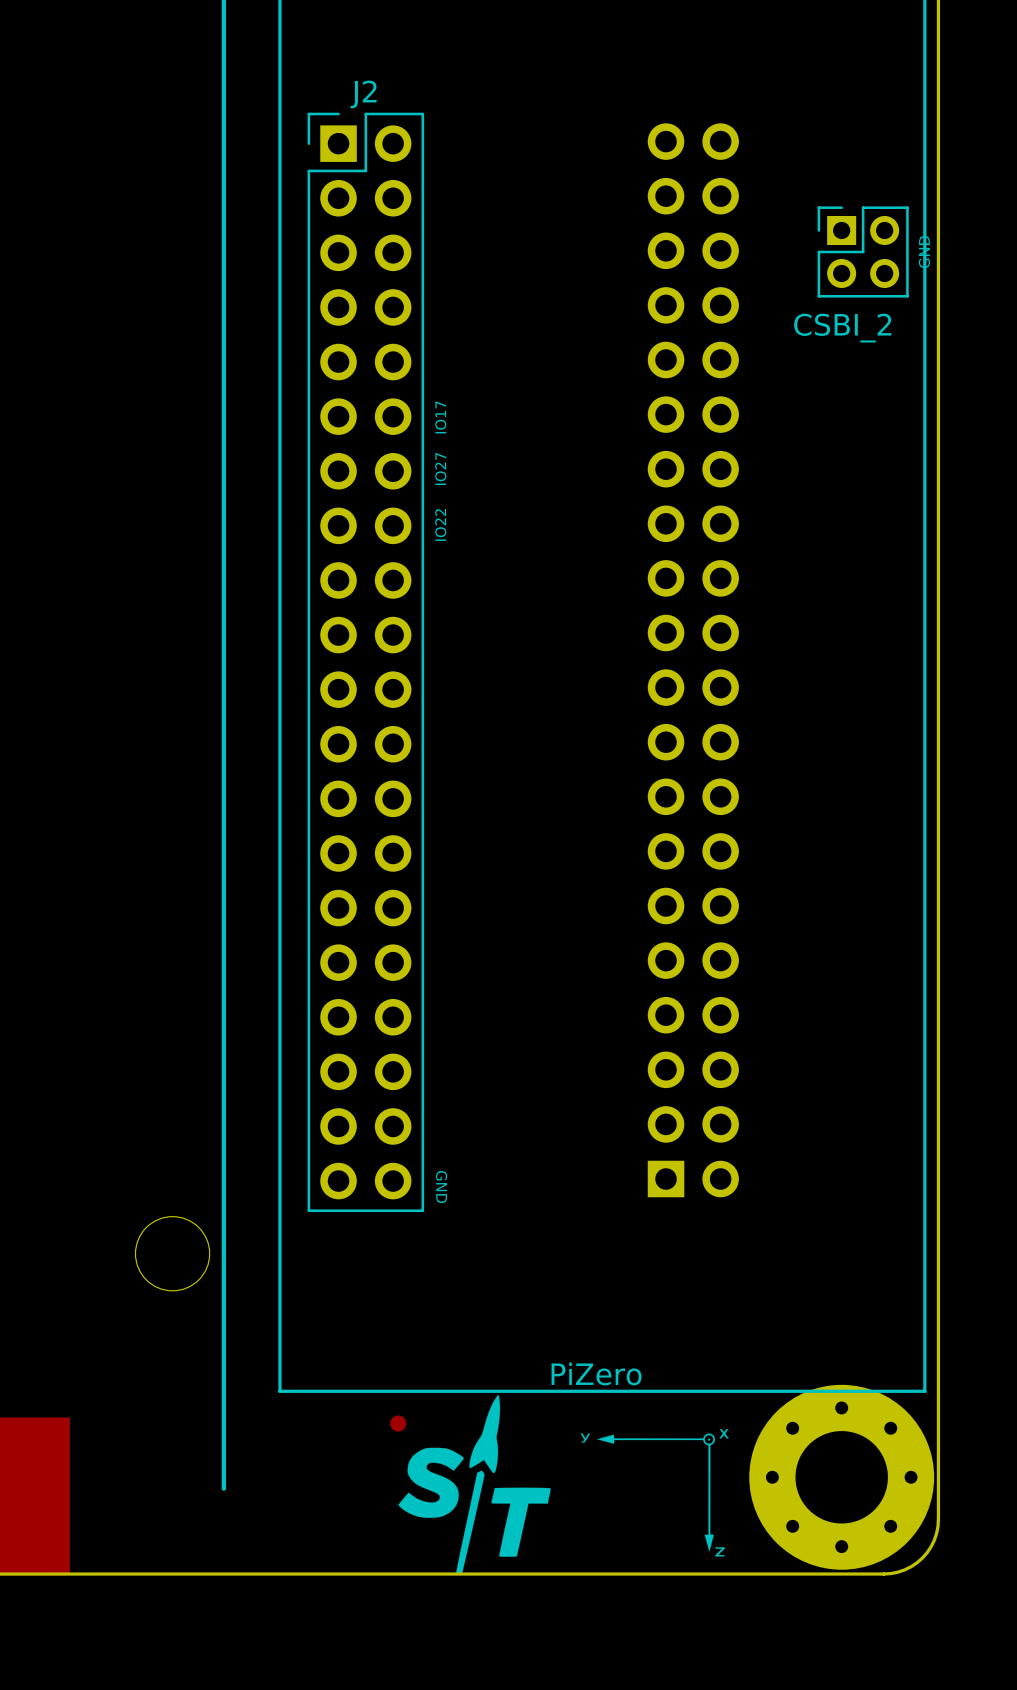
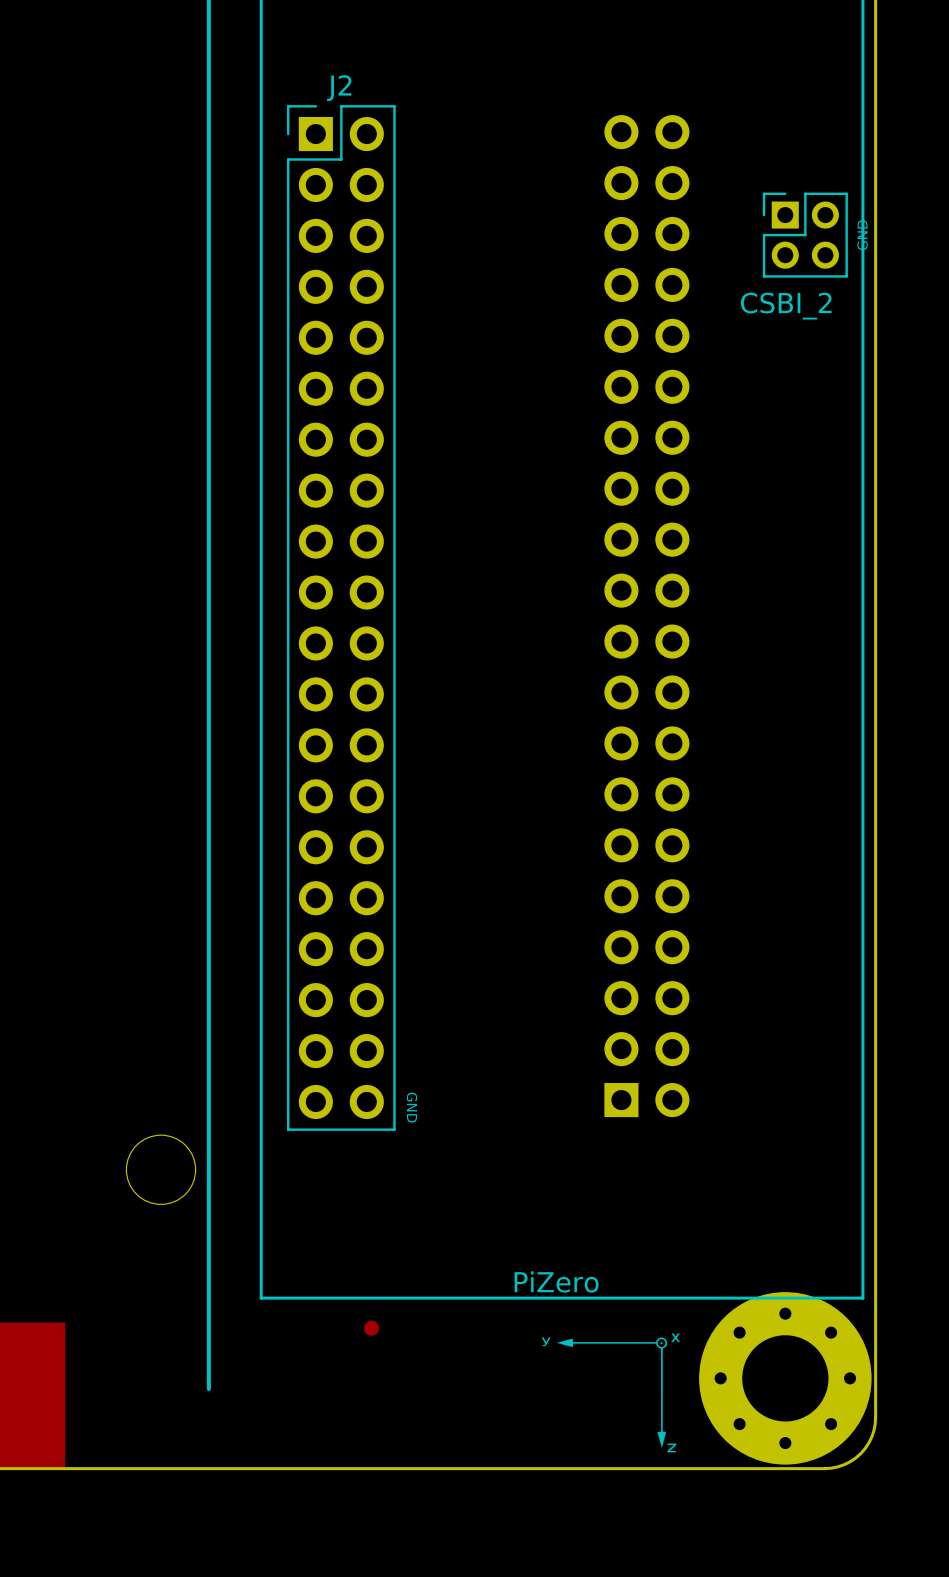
text: IO17 (440, 417) -> none
text: IO27 (440, 469) -> none
text: IO22 (440, 525) -> none
drawing: [398, 1394, 551, 1574] -> none

